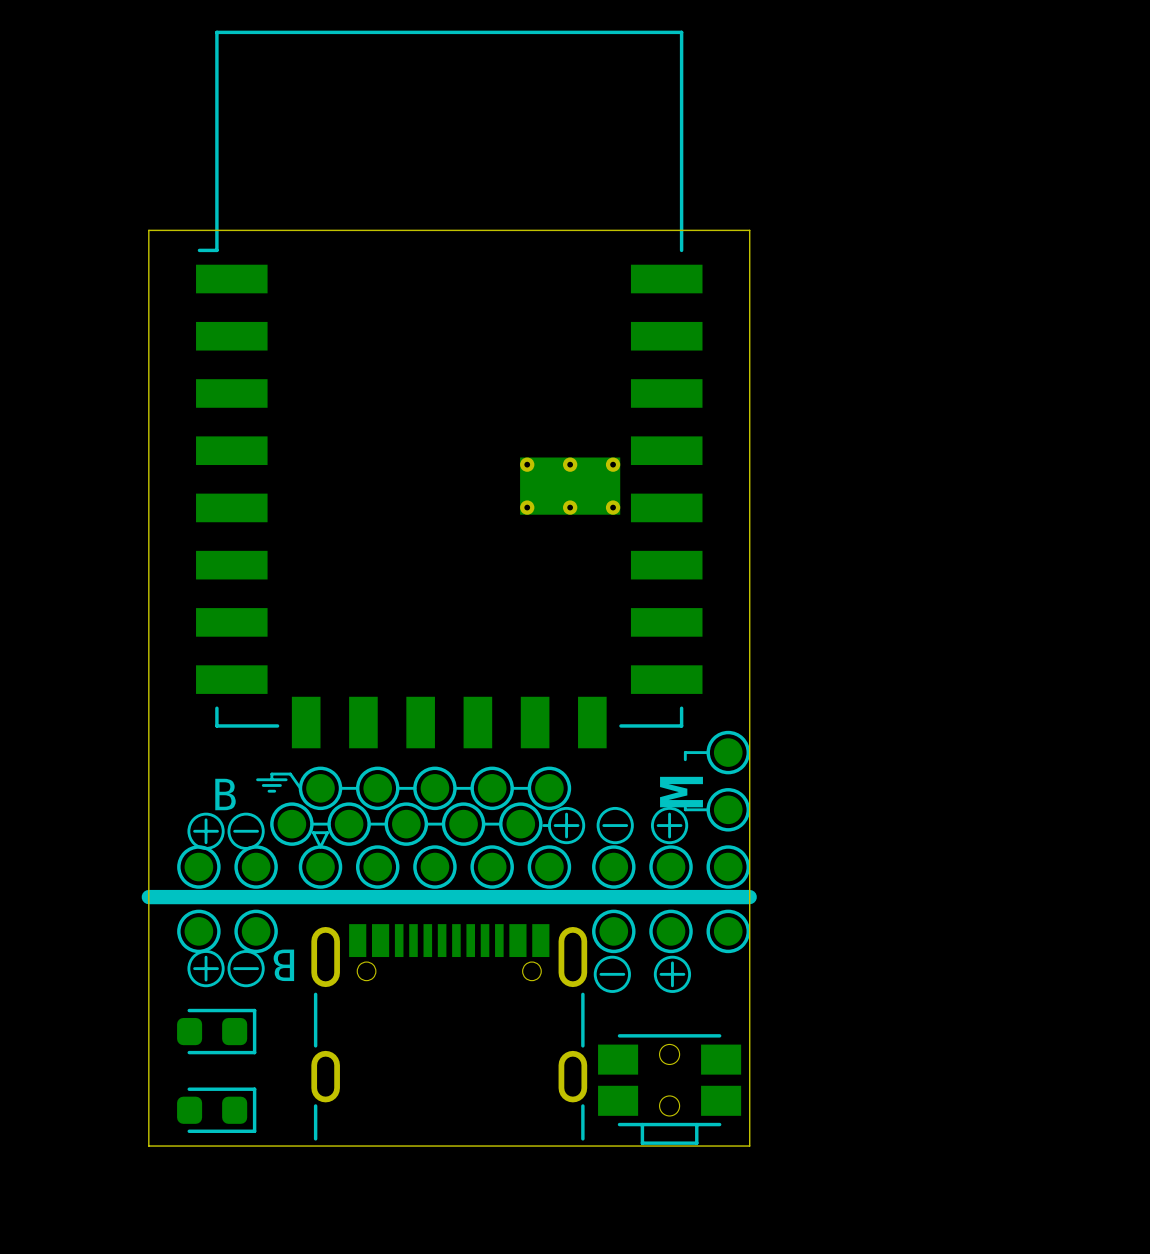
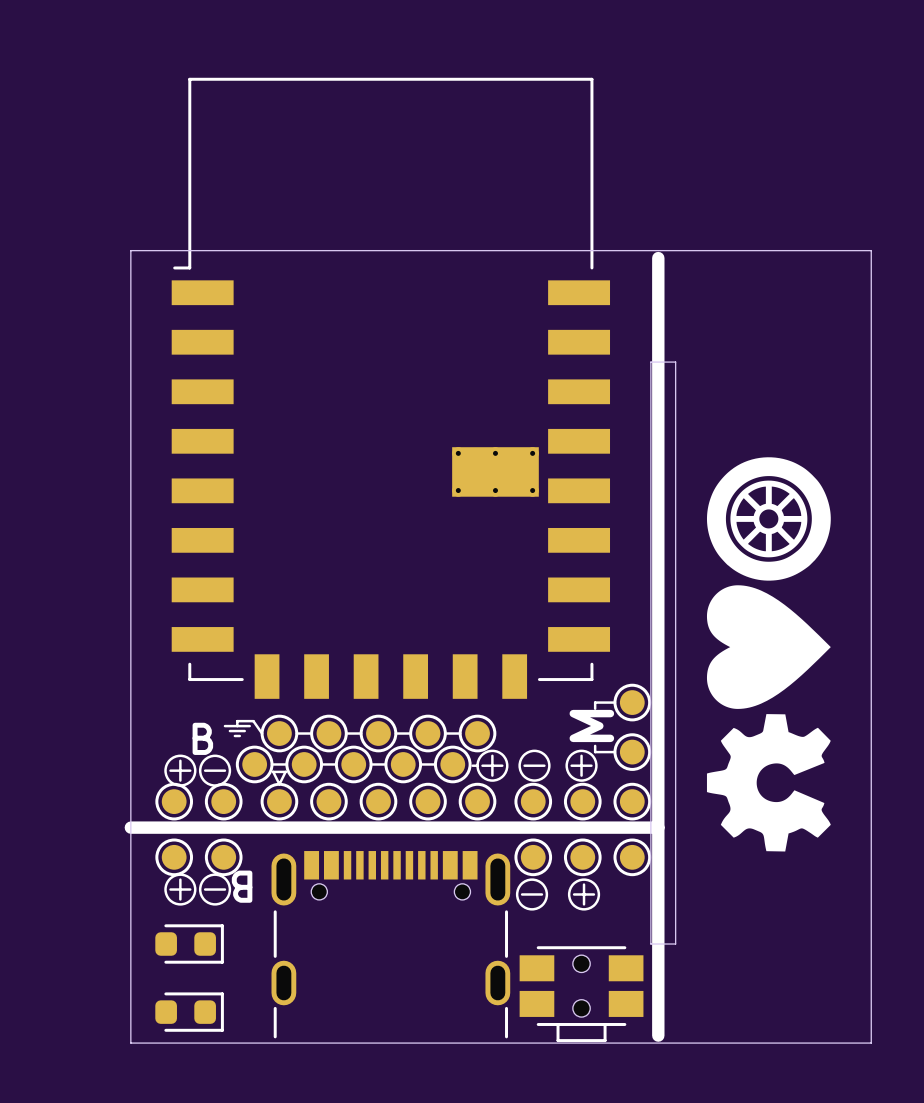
board edge: (749, 230) (749, 359) -> (650, 250) (871, 250) (871, 1043) (650, 1043)
line: none -> (658, 258) (658, 1035)
drawing: none -> [706, 457, 831, 852]
board edge: (749, 1031) (749, 1146) -> (650, 944) (675, 944) (675, 362) (650, 362)

